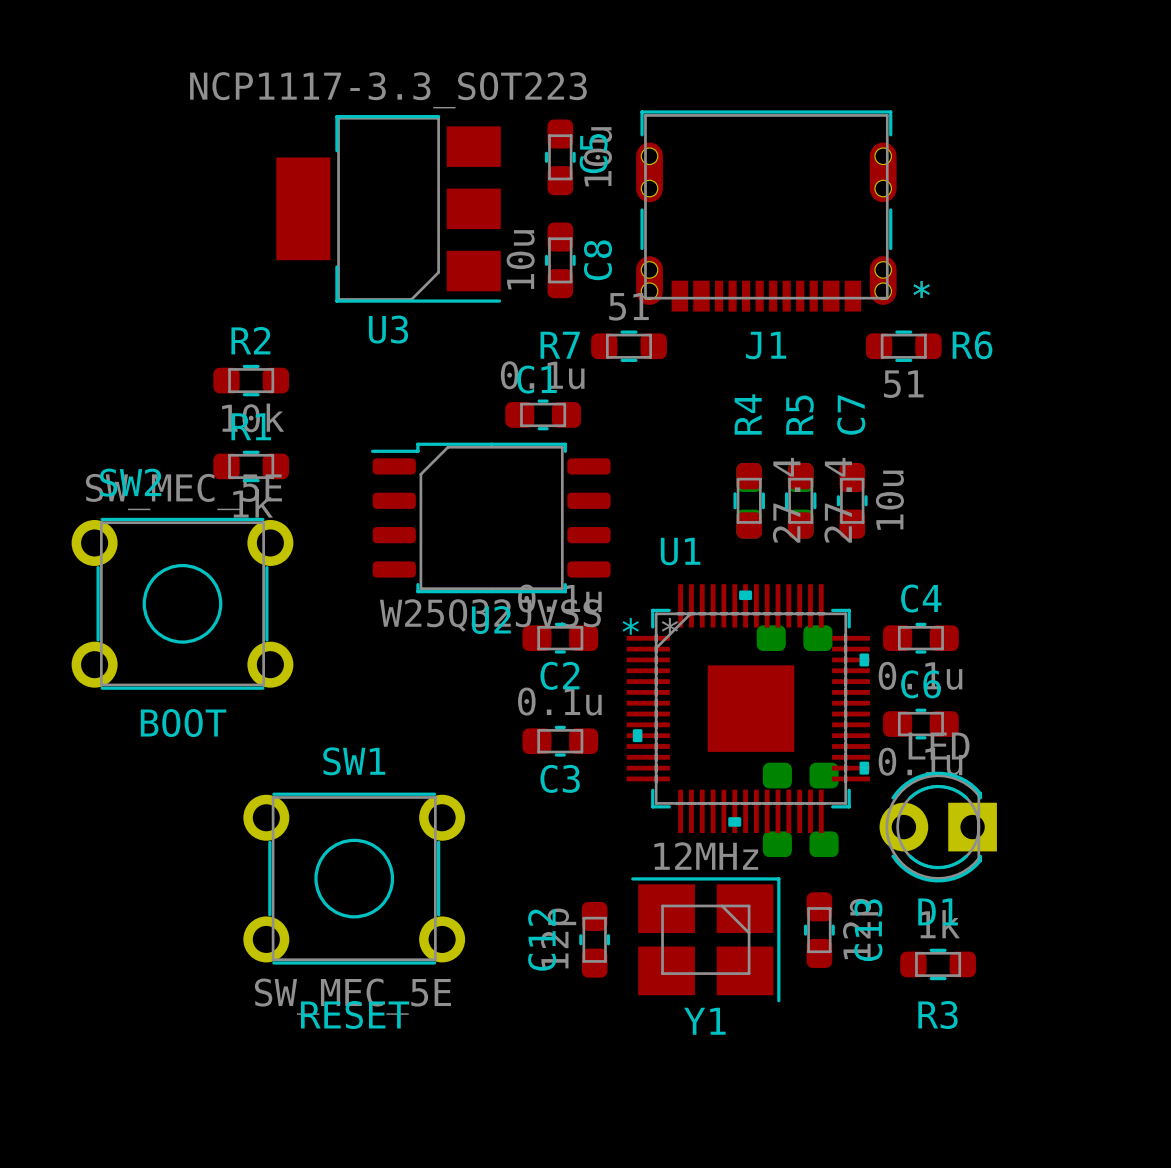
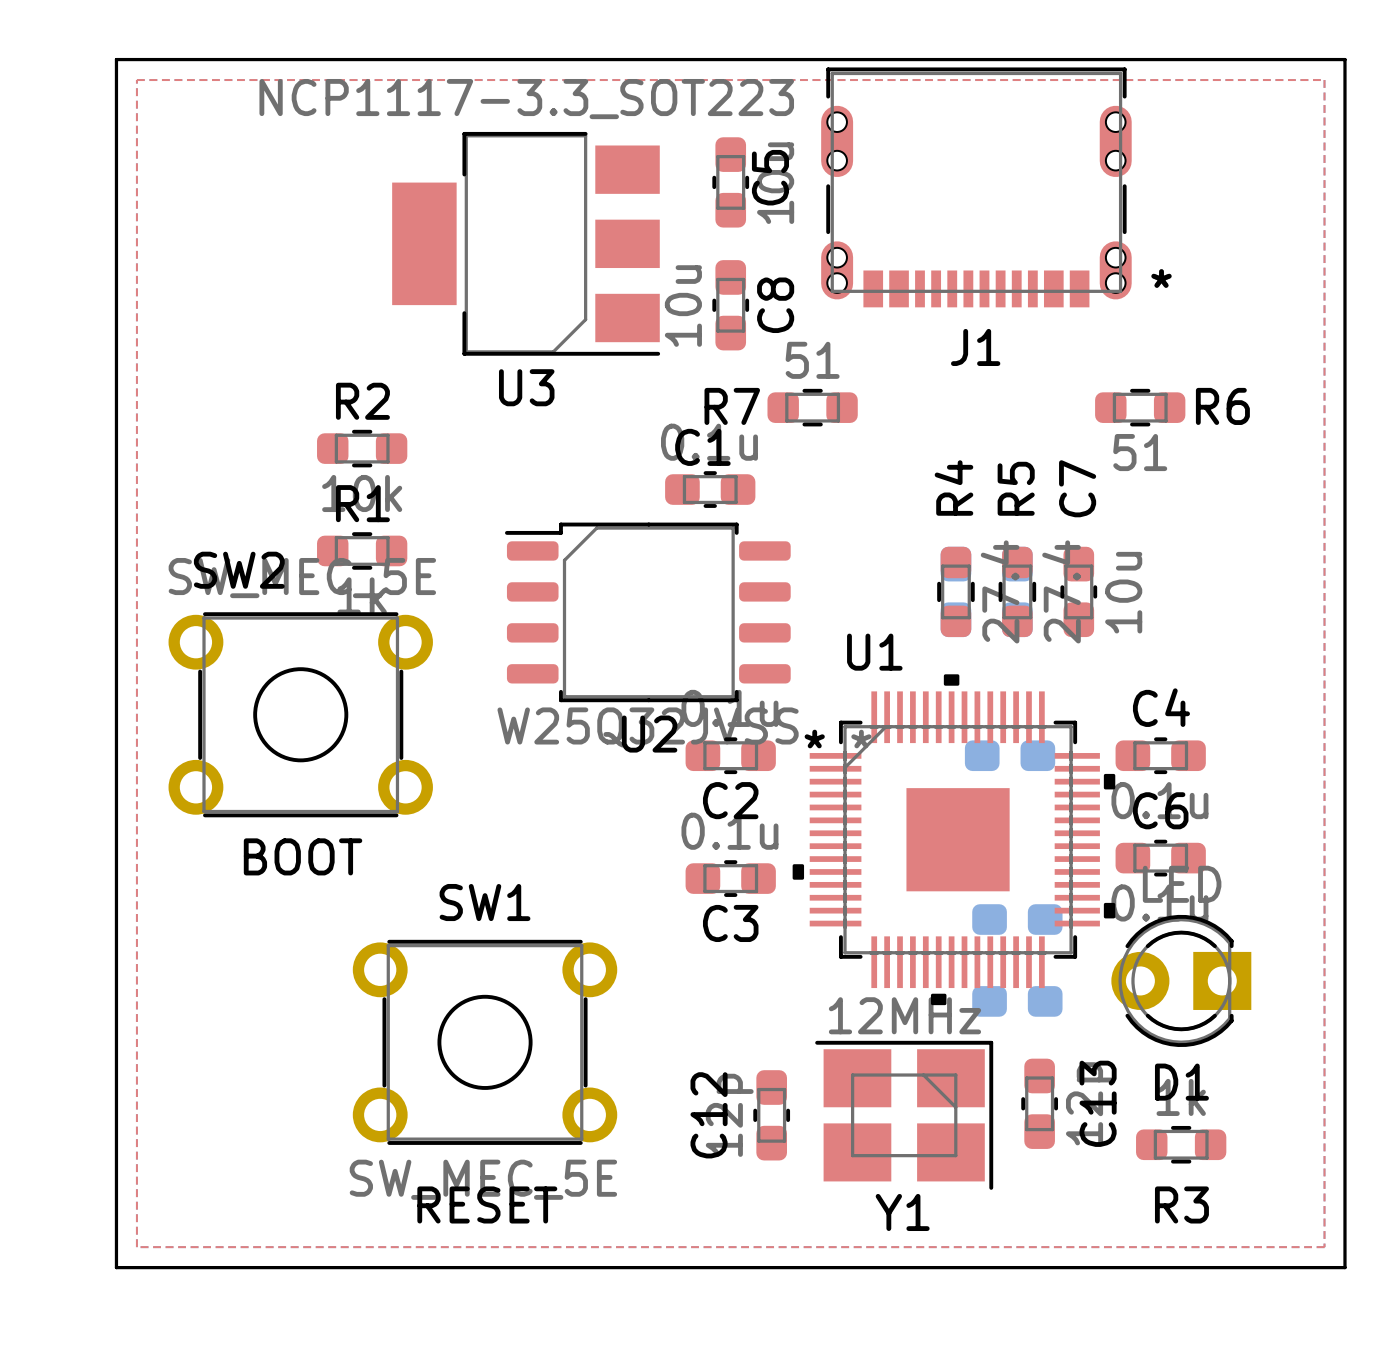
board edge: none -> (116, 59) (116, 1267) (1344, 1267) (1344, 59) (116, 59)
top zone outline: none -> (136, 80) (136, 1247) (1324, 1247) (1324, 80) (136, 80)
J1 position: (766, 210) -> (976, 187)
U1 footprint: [626, 584, 870, 834] -> [792, 674, 1116, 1006]
SW2 position: (182, 603) -> (300, 714)
text position: BOOT (183, 723) -> BOOT (303, 856)

